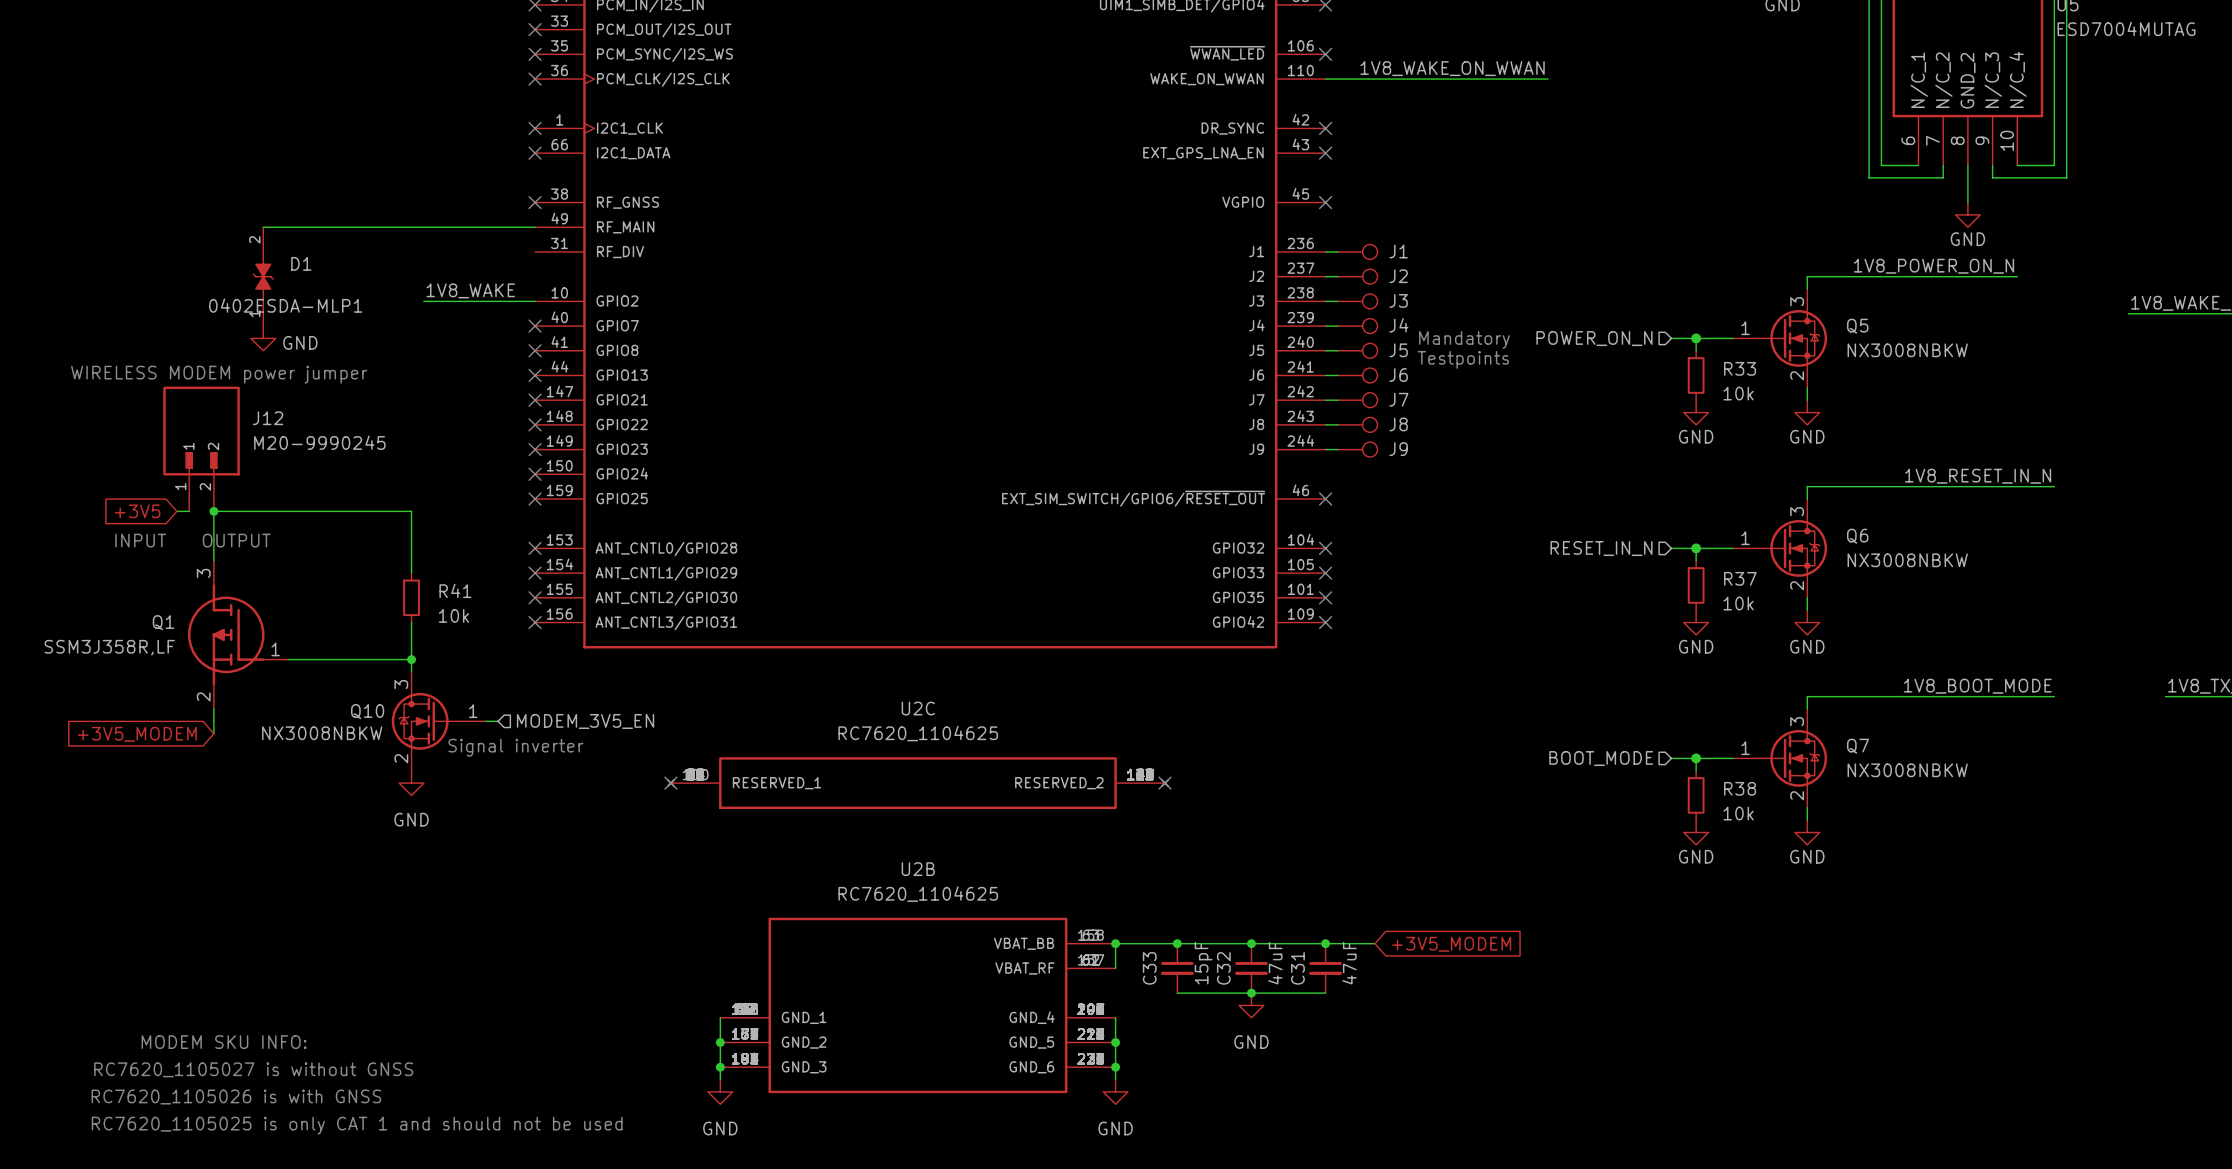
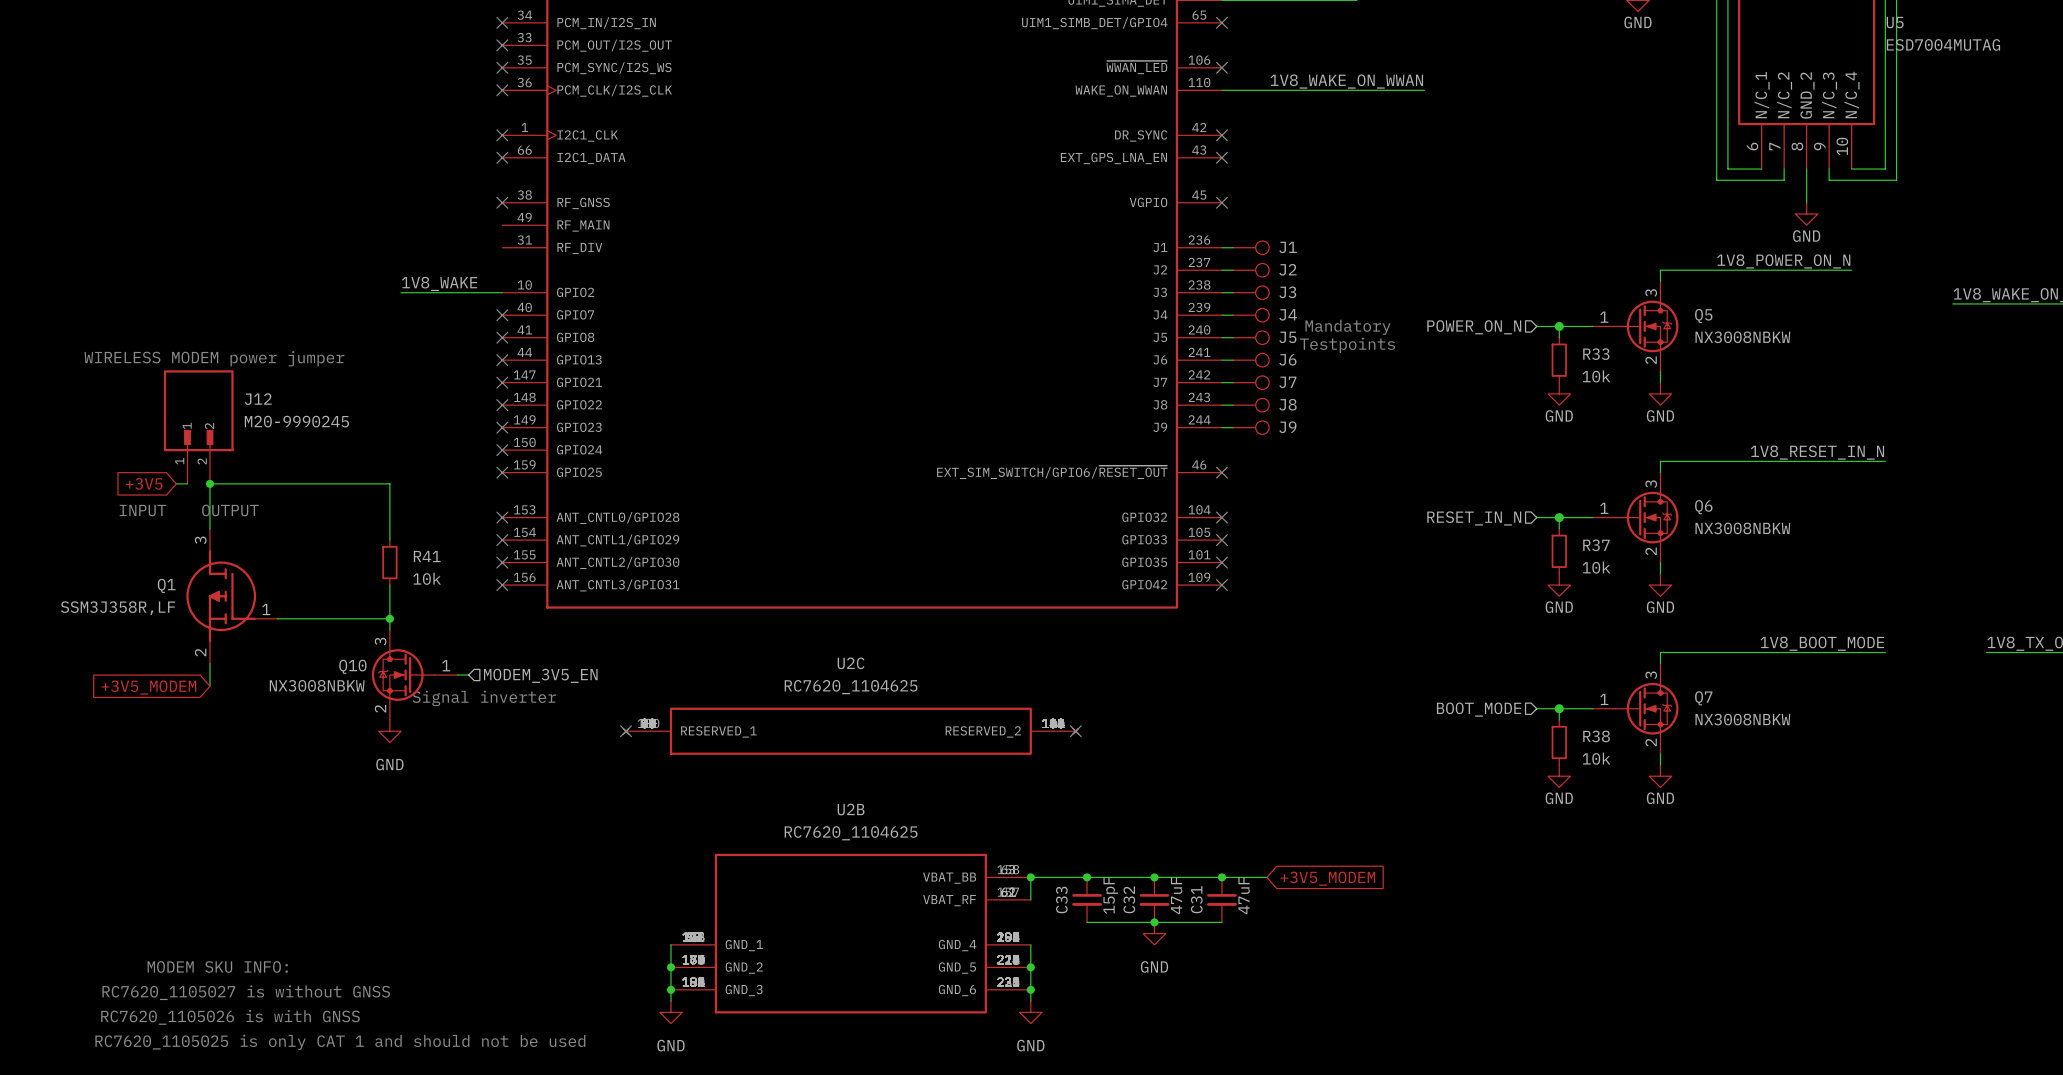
wire: (263, 227) (535, 227) -> none
D1: 0402ESDA-MLP1 (263, 276) -> none
power symbol: GND (263, 338) -> none

